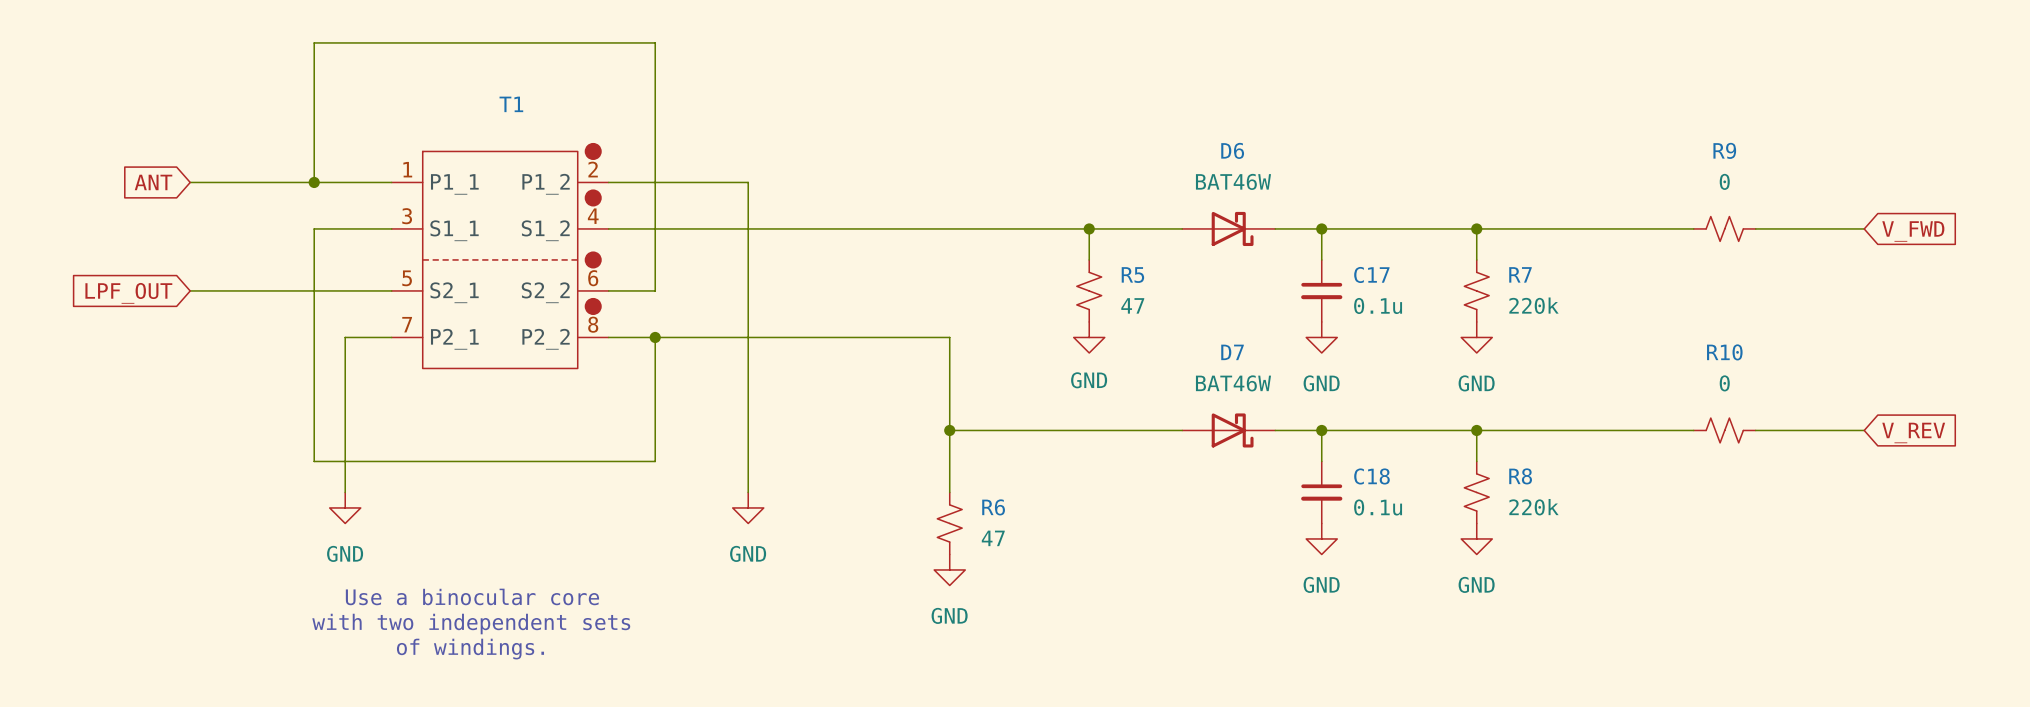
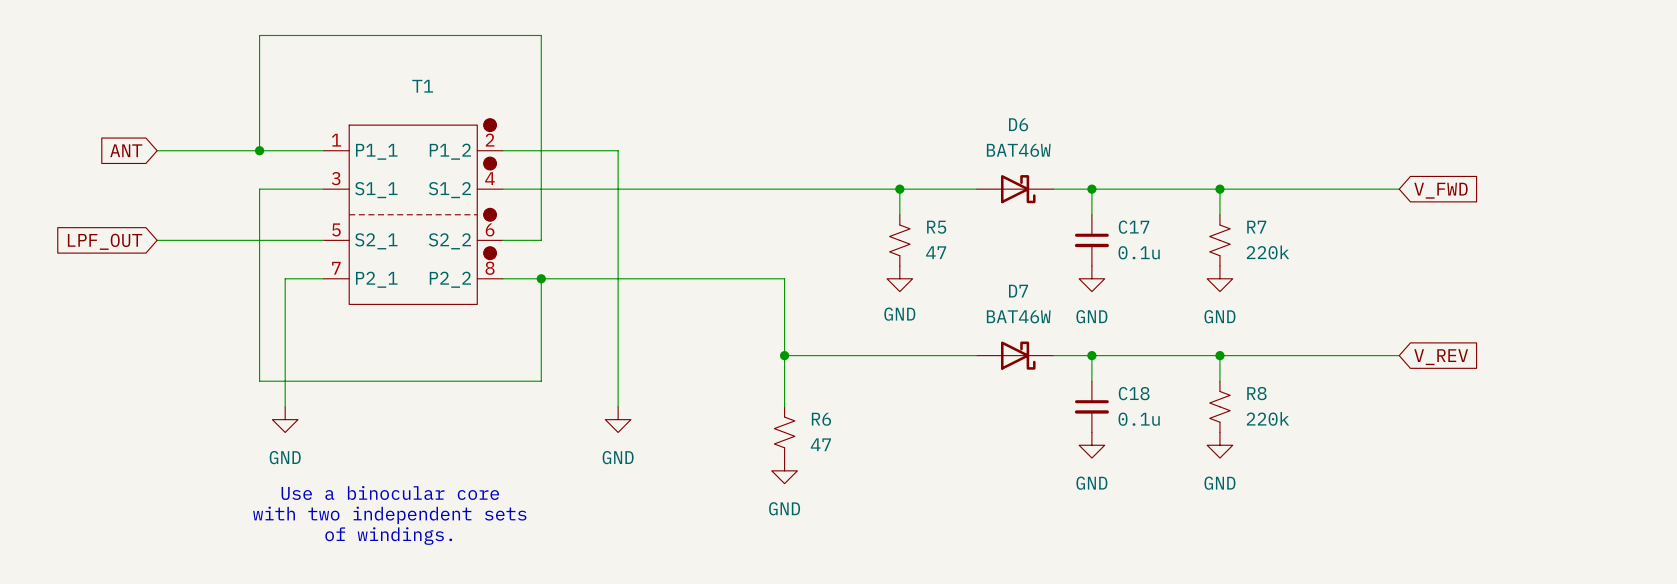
R9: 0 (1724, 228) -> none
wire: (1755, 228) (1864, 228) -> none
global label position: V_FWD (1913, 231) -> V_FWD (1440, 190)
R10: 0 (1724, 430) -> none
wire: (1755, 430) (1864, 430) -> none
global label position: V_REV (1913, 432) -> V_REV (1441, 357)

